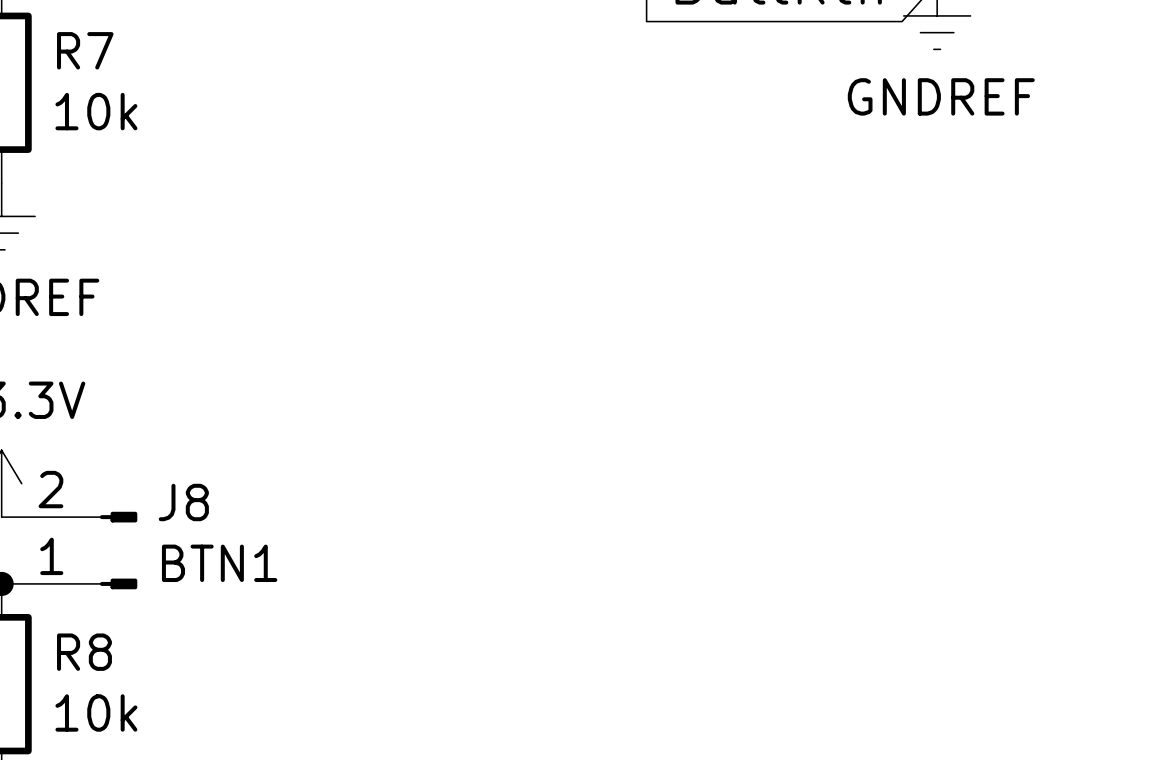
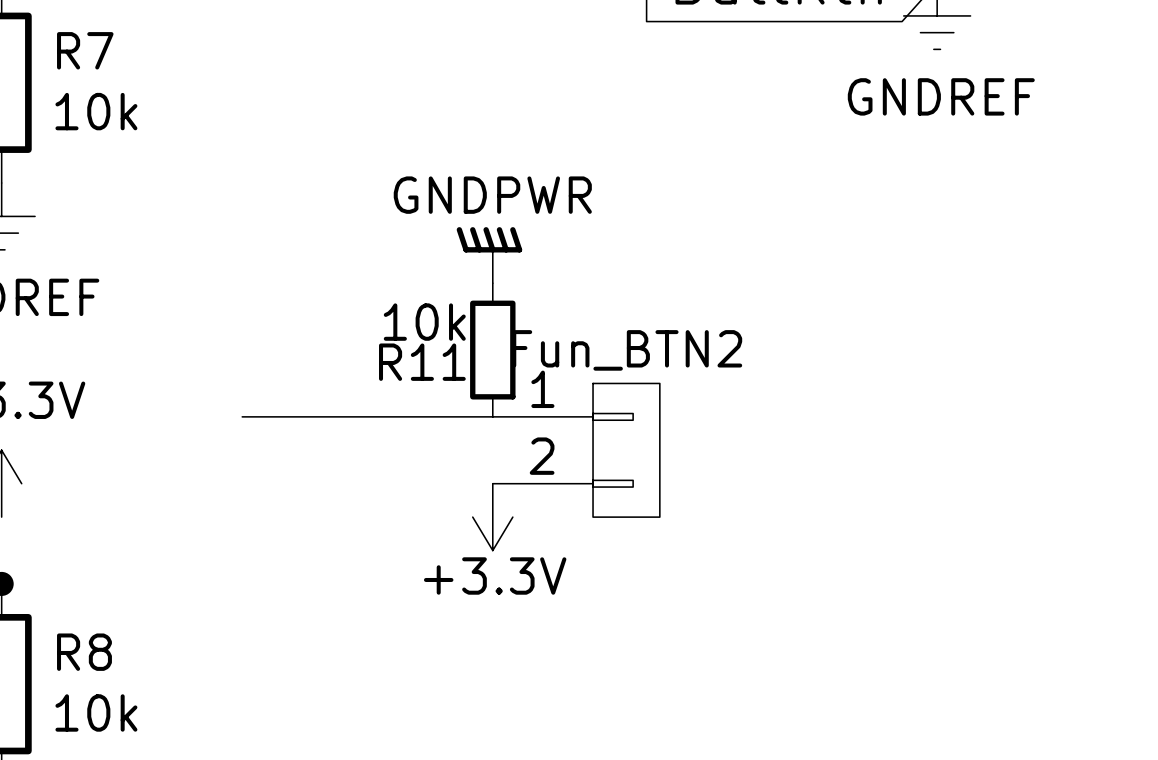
power symbol: none -> GNDPWR (489, 255)
R11: none -> 10k (492, 350)
wire: none -> (242, 416) (492, 416)
Fun_BTN2: none -> (576, 450)
power symbol: none -> +3.3V (492, 517)
J8: BTN1 (69, 550) -> none

